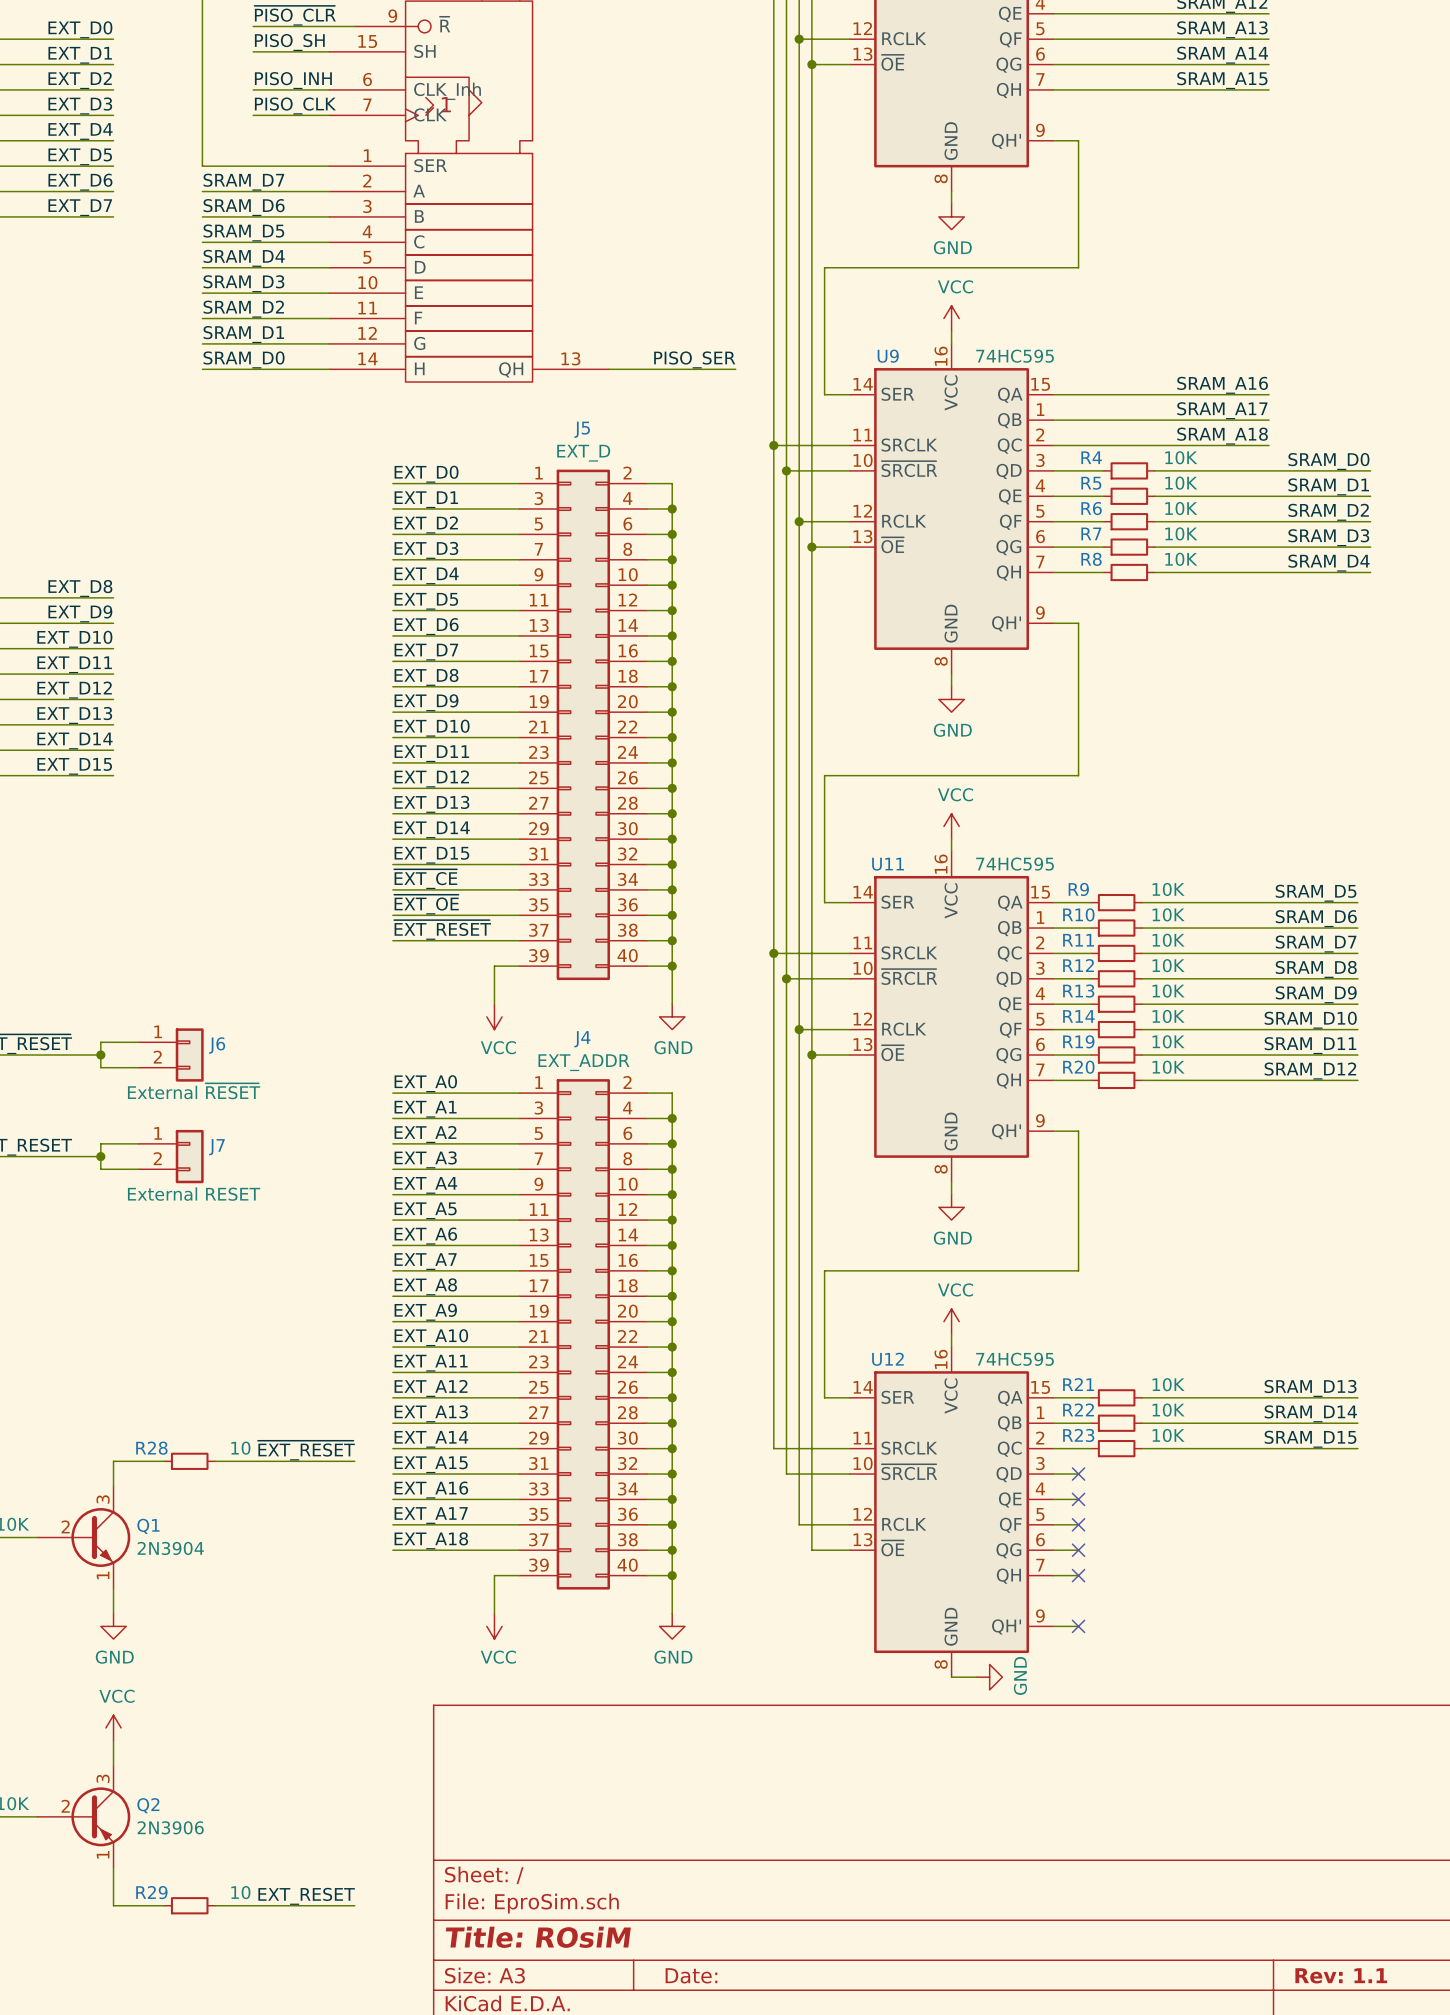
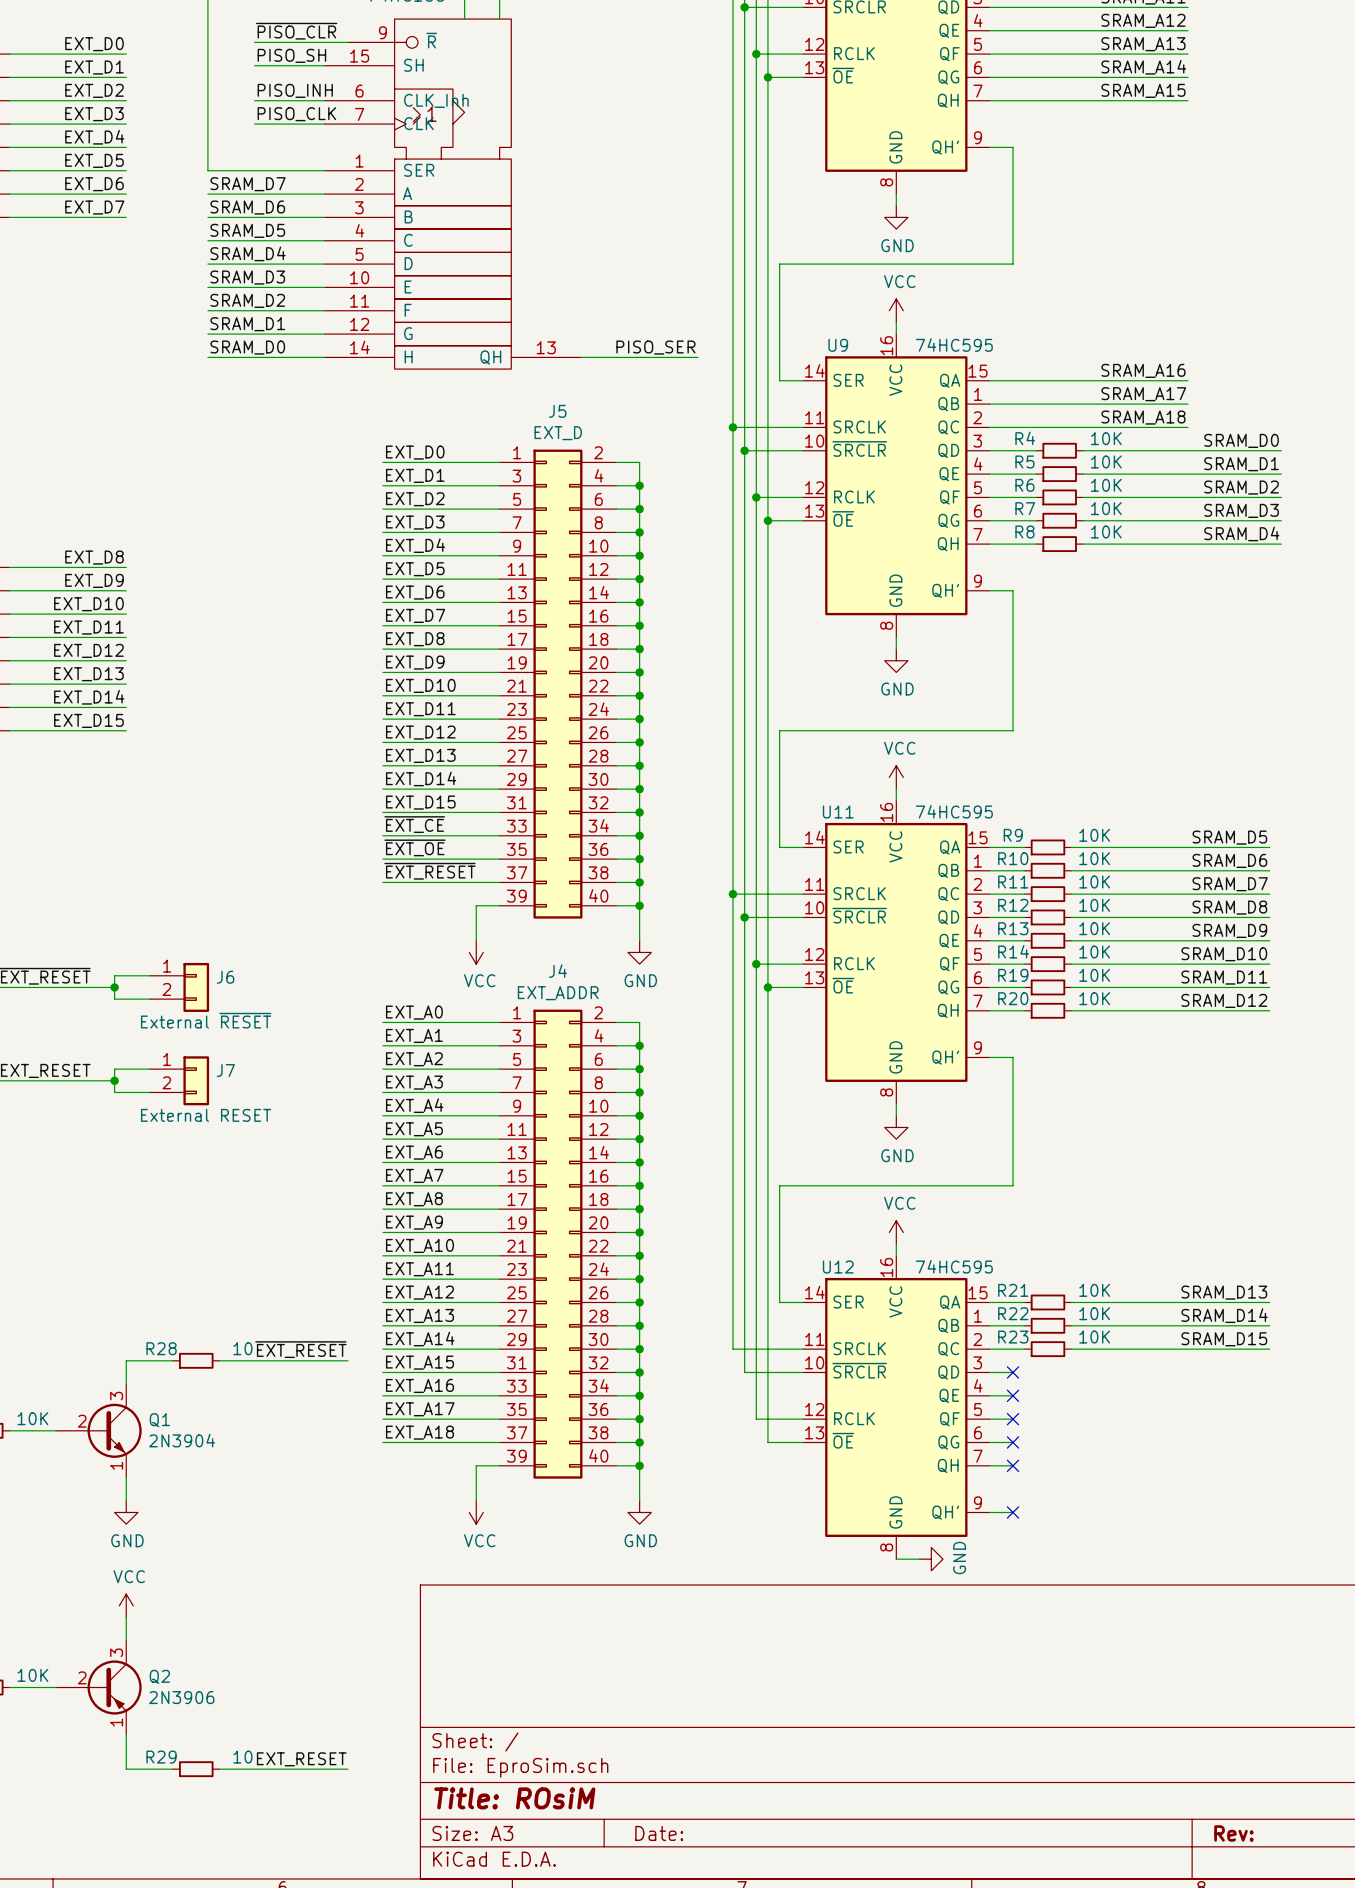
title block: Rev: 1.1 (1341, 1975) -> Rev: (1233, 1833)

